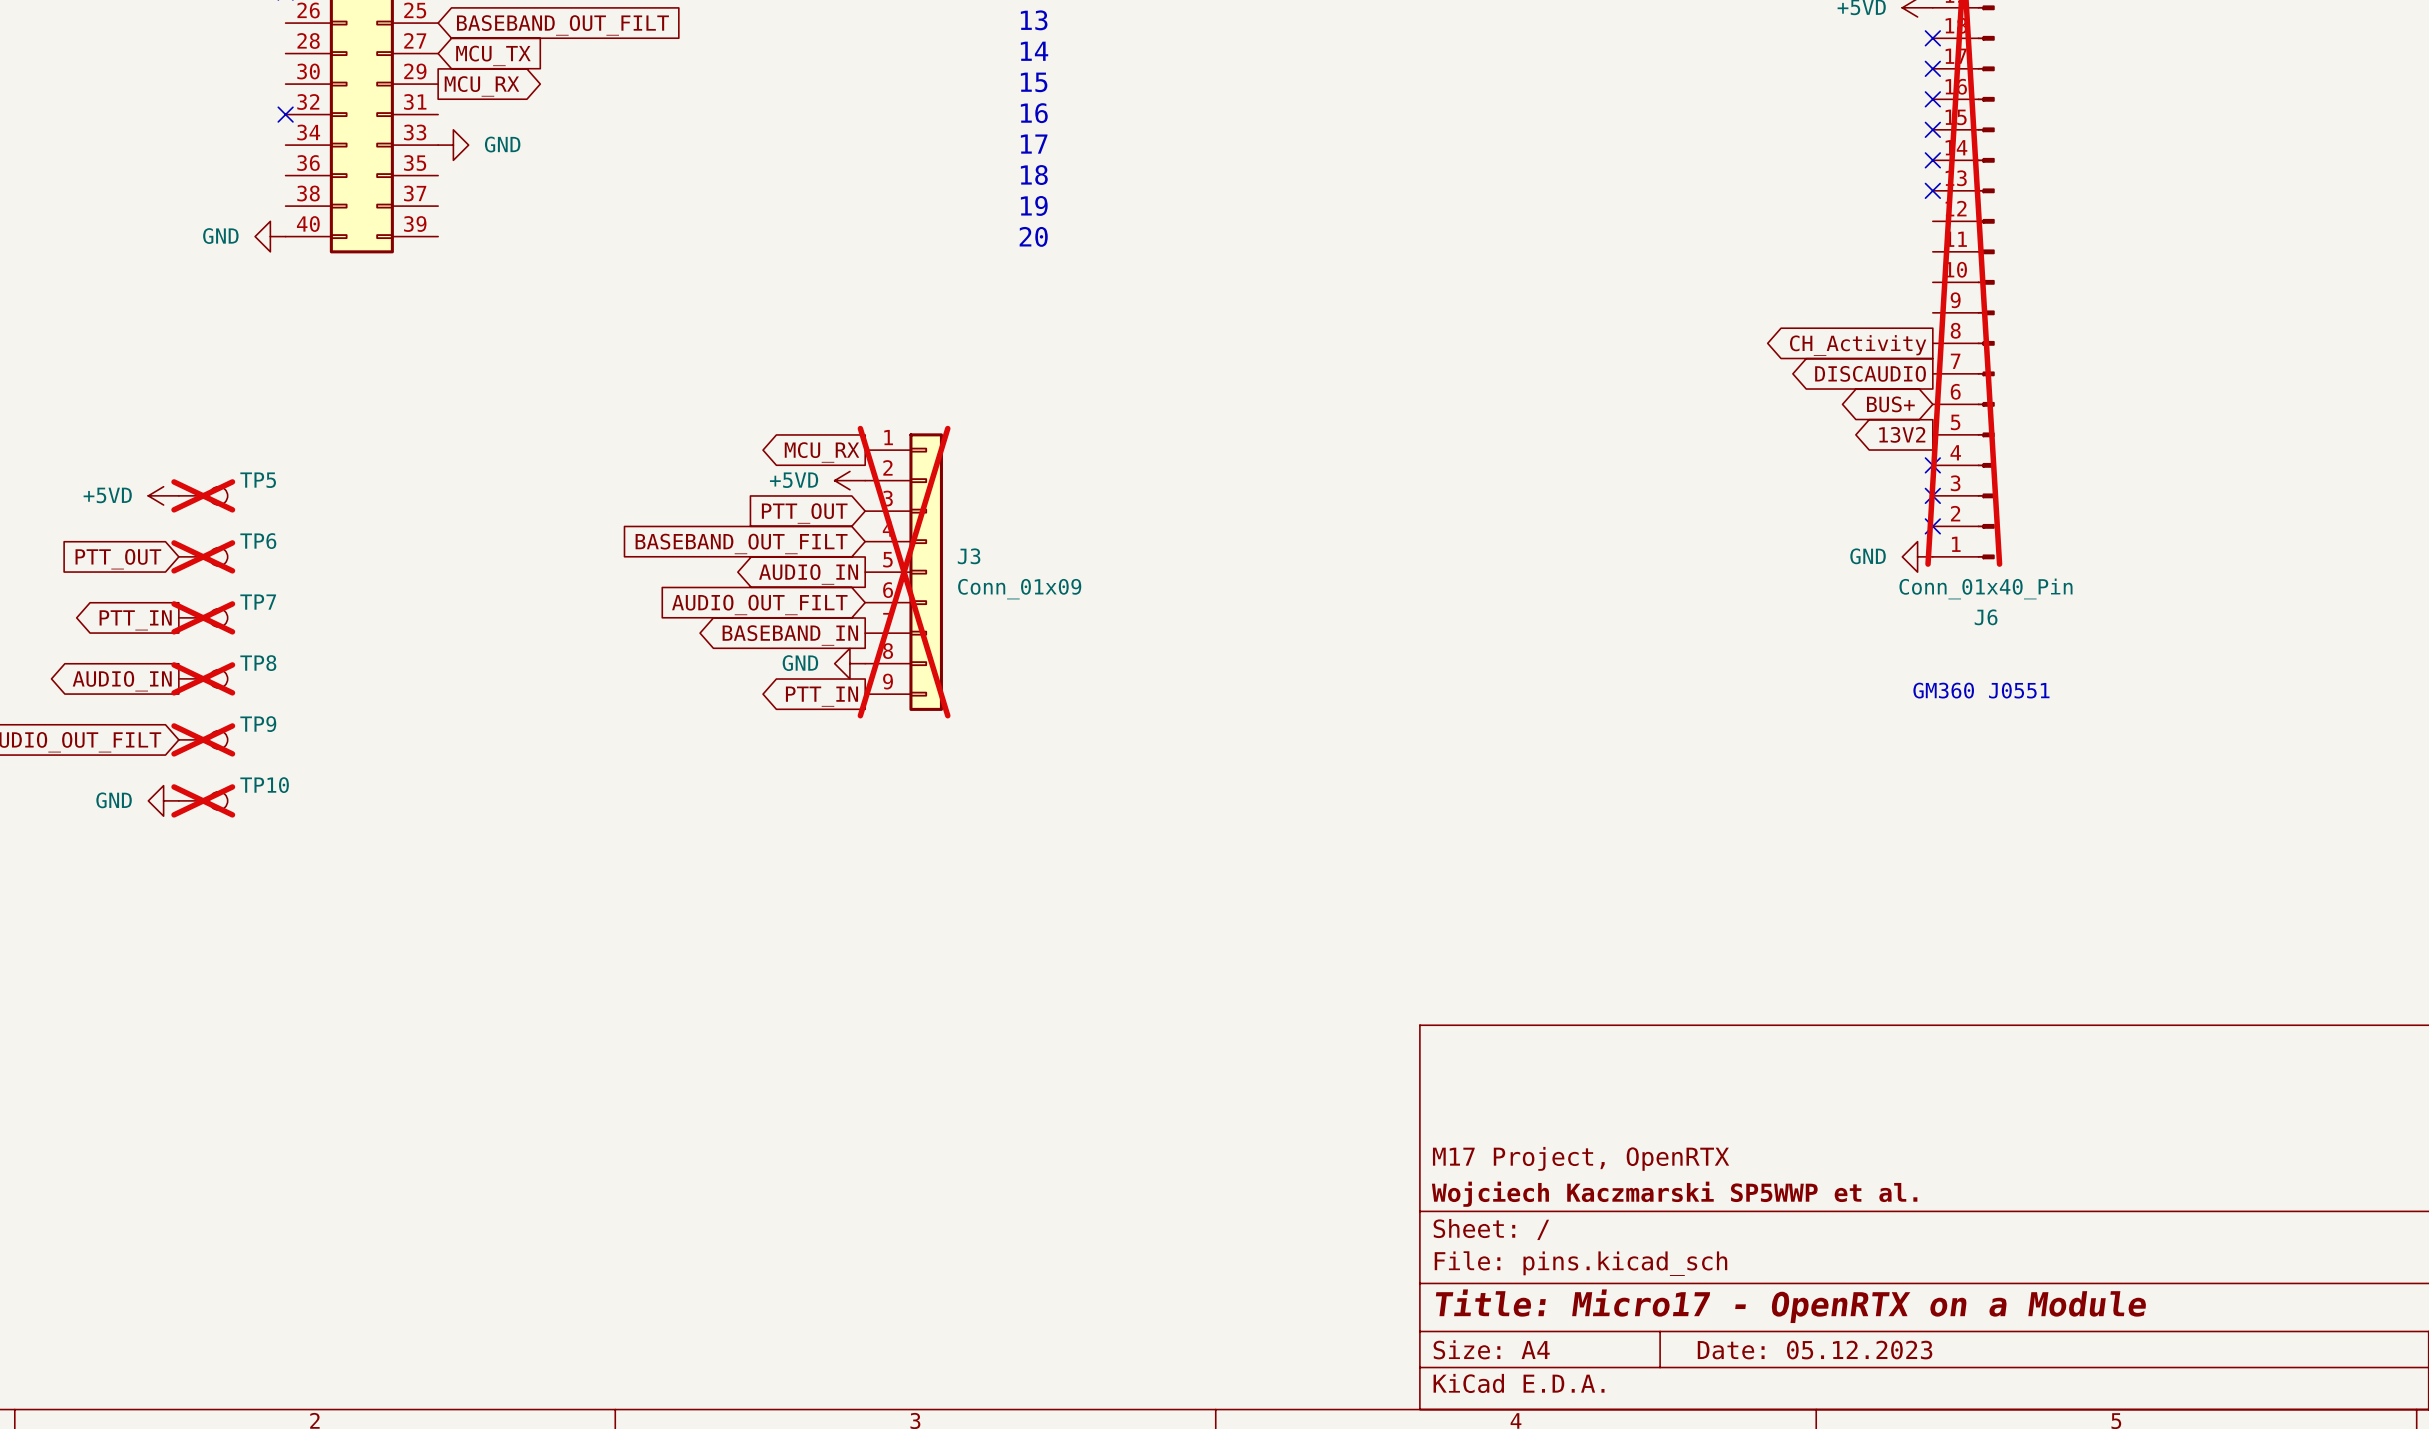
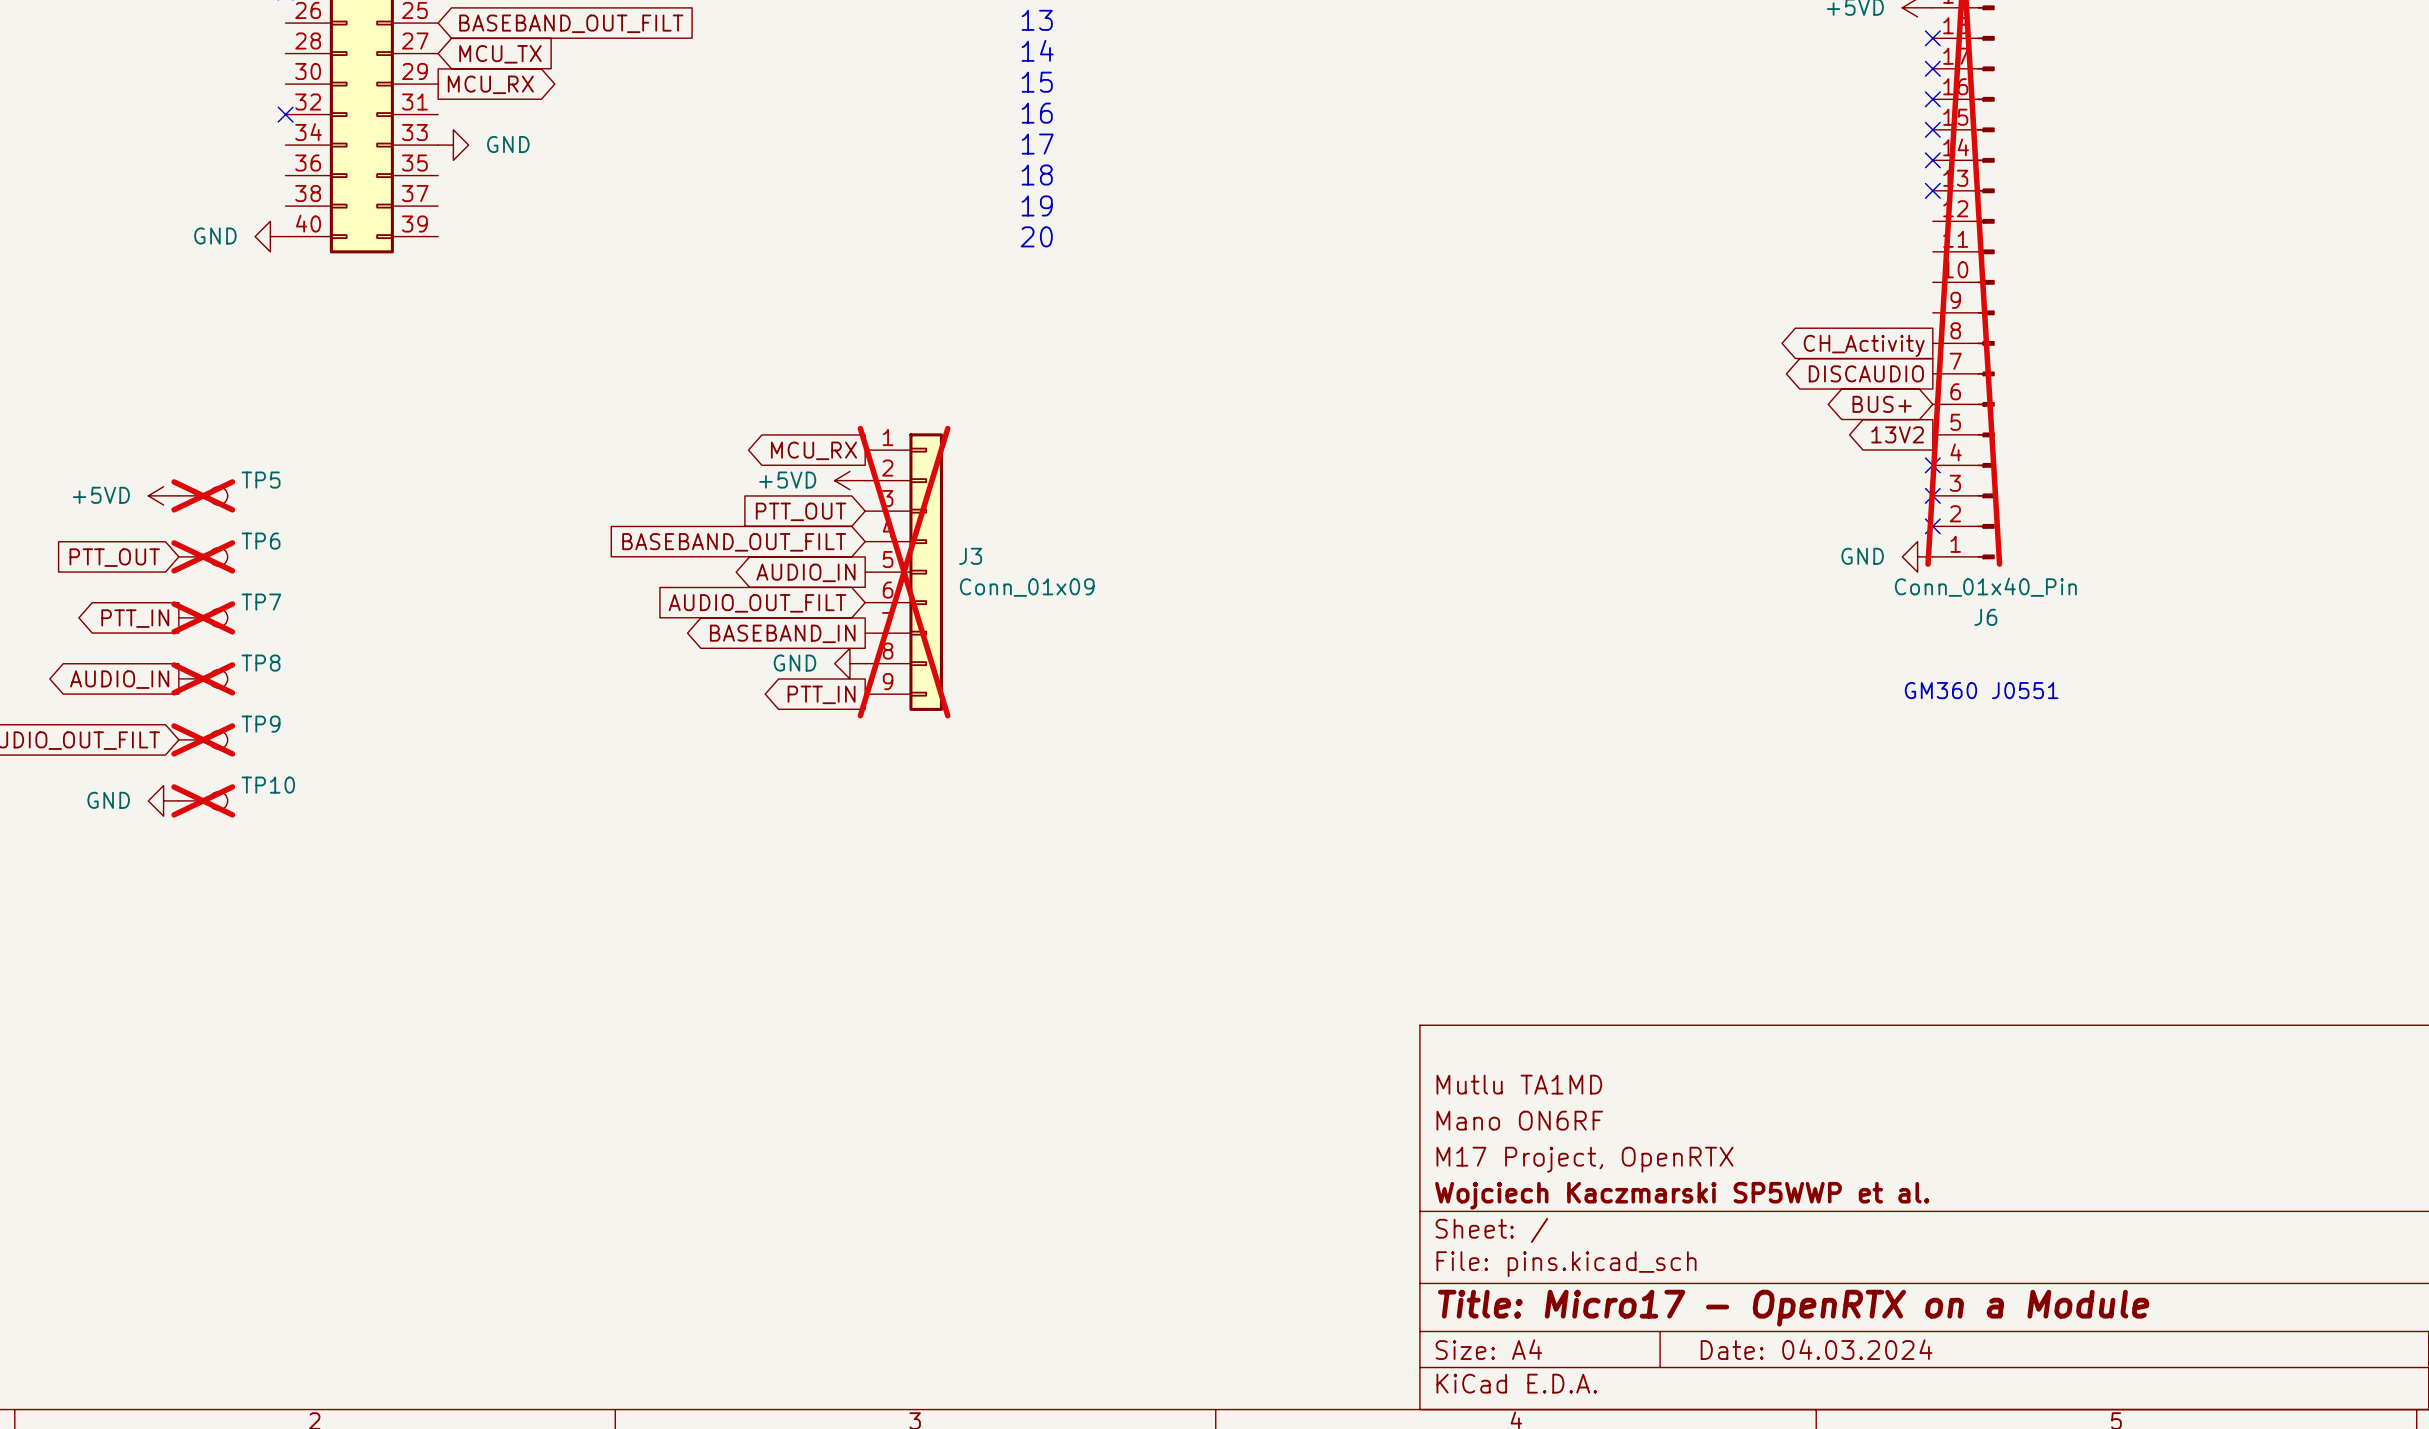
title block: none -> Mutlu TA1MD (1519, 1084)
title block: none -> Mano ON6RF (1519, 1120)
title block: Date: 05.12.2023 (1815, 1350) -> Date: 04.03.2024 (1816, 1349)

